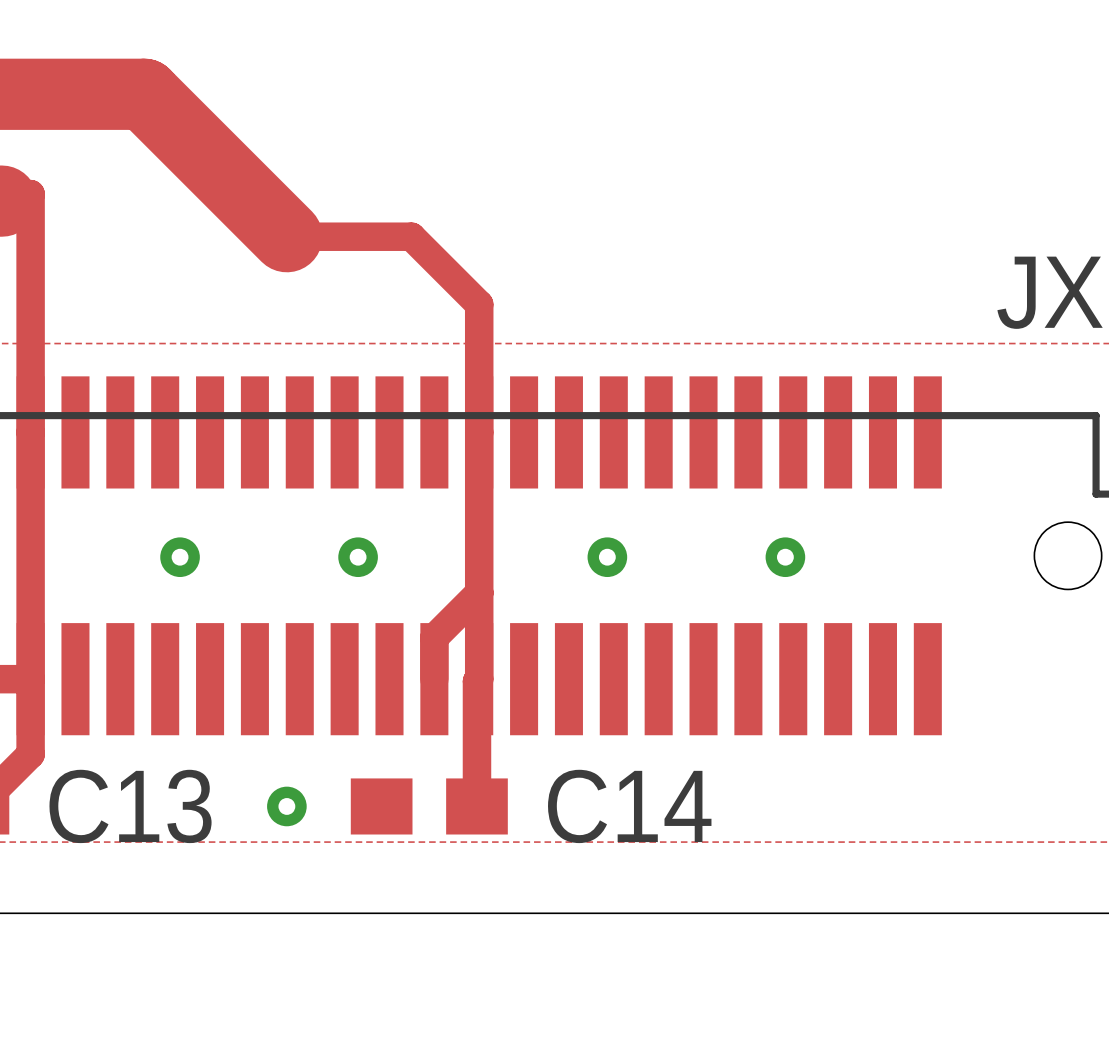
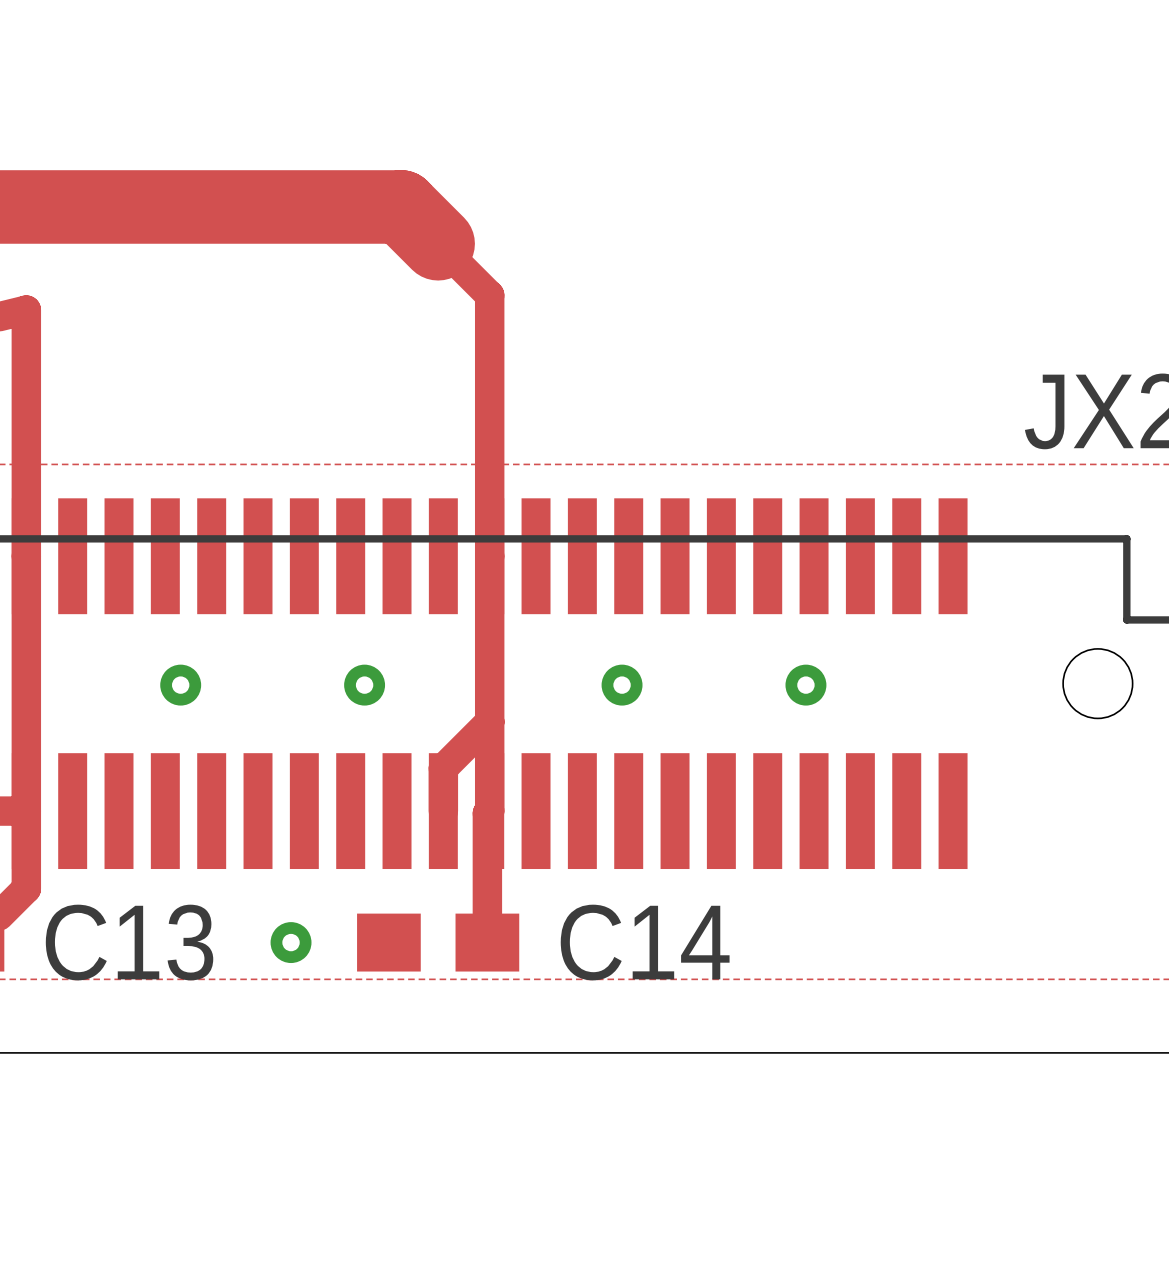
track: (144, 94) (286, 236) (411, 236) (479, 304) -> (143, 206) (401, 206) (489, 295) (489, 424)

